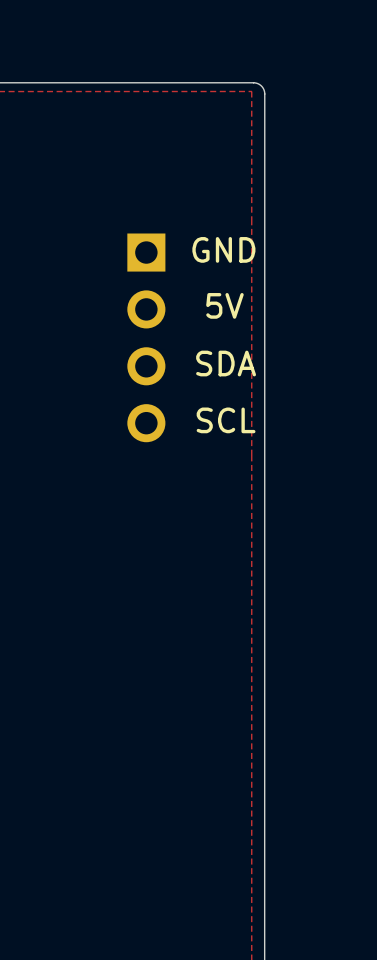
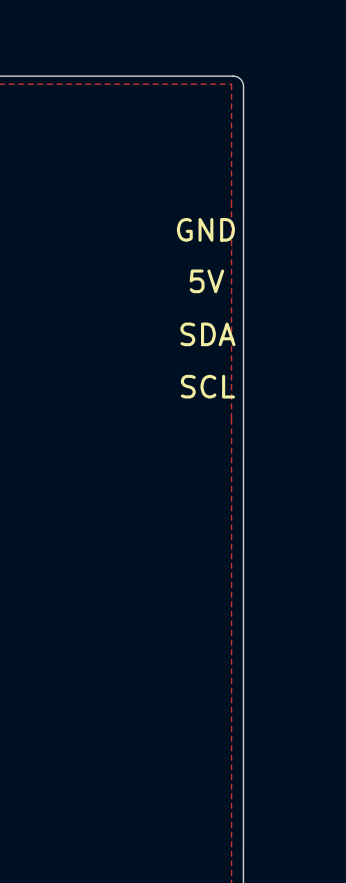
part: (146, 337) -> none

